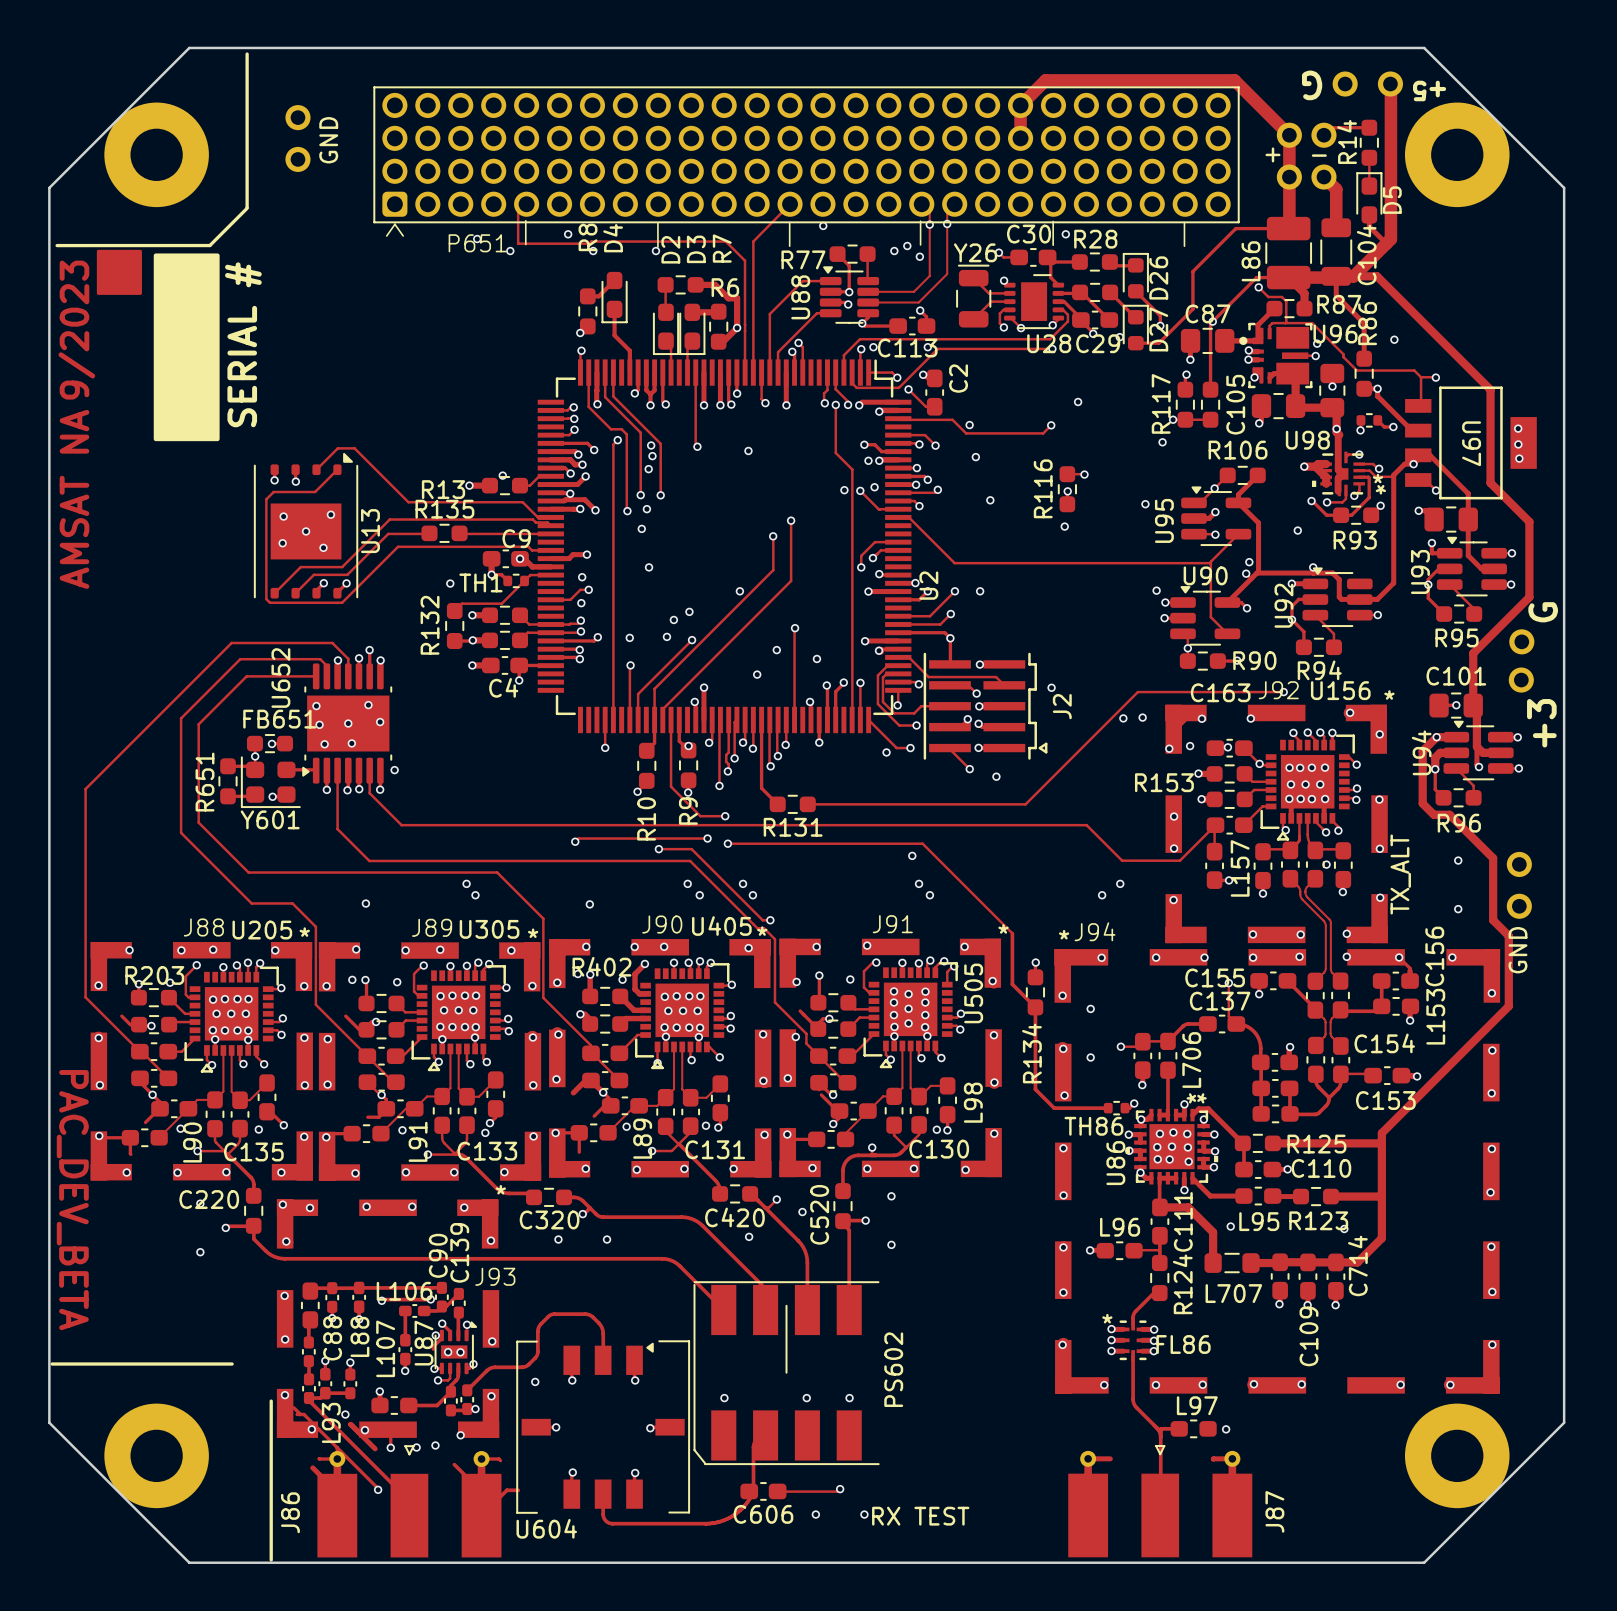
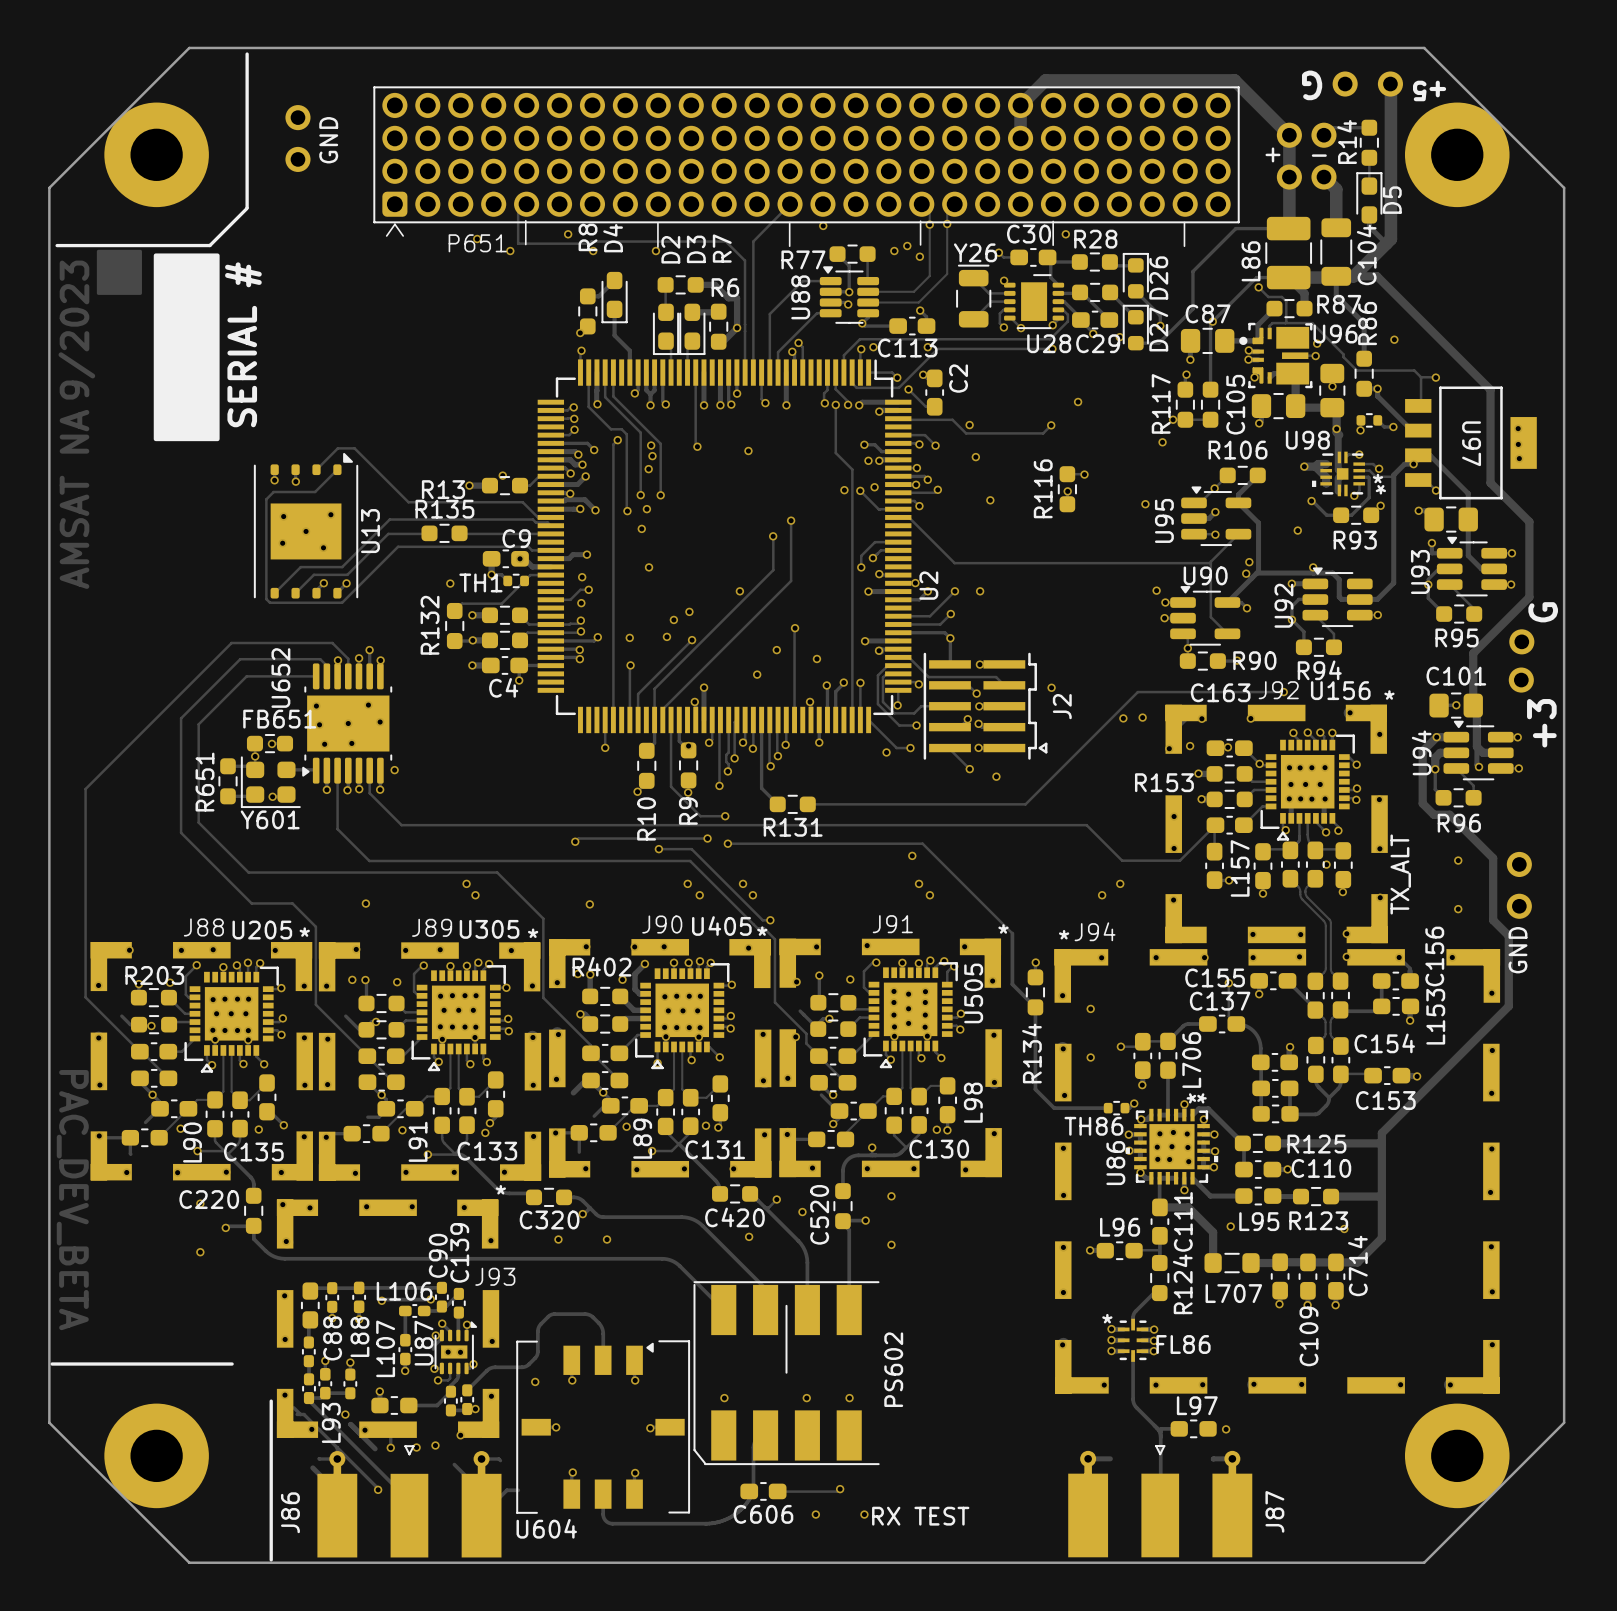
track: (1345, 490) (1345, 498) (1342, 502) (1327, 502) -> none
via: (1327, 502) -> none
via: (1064, 526) -> none

